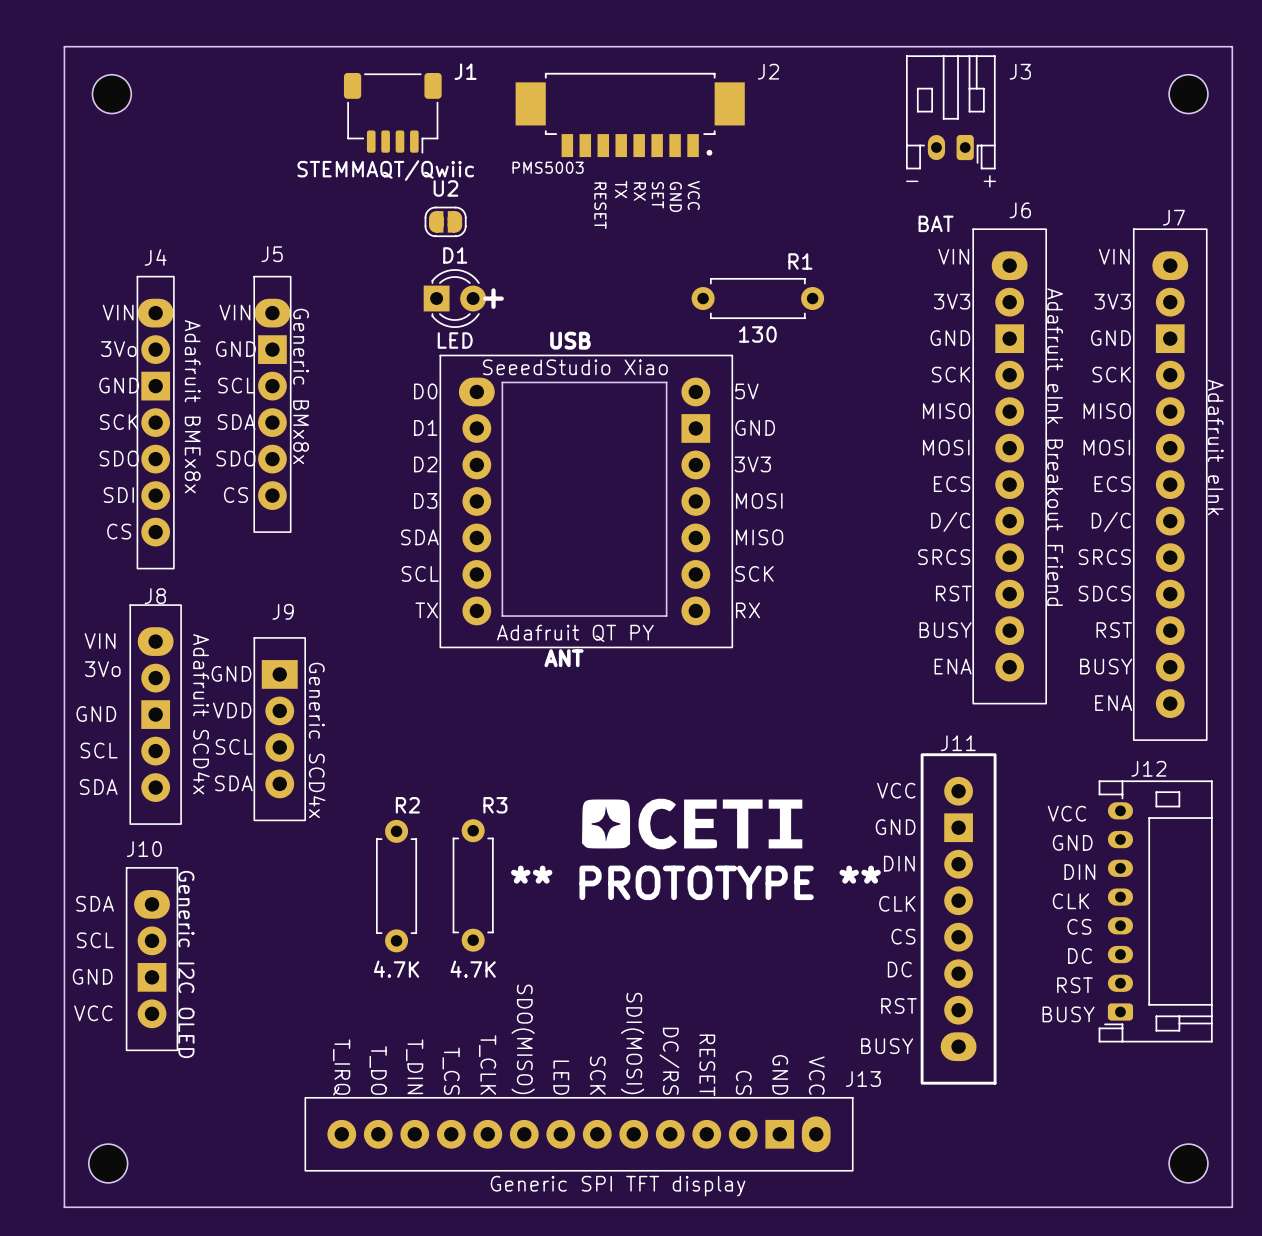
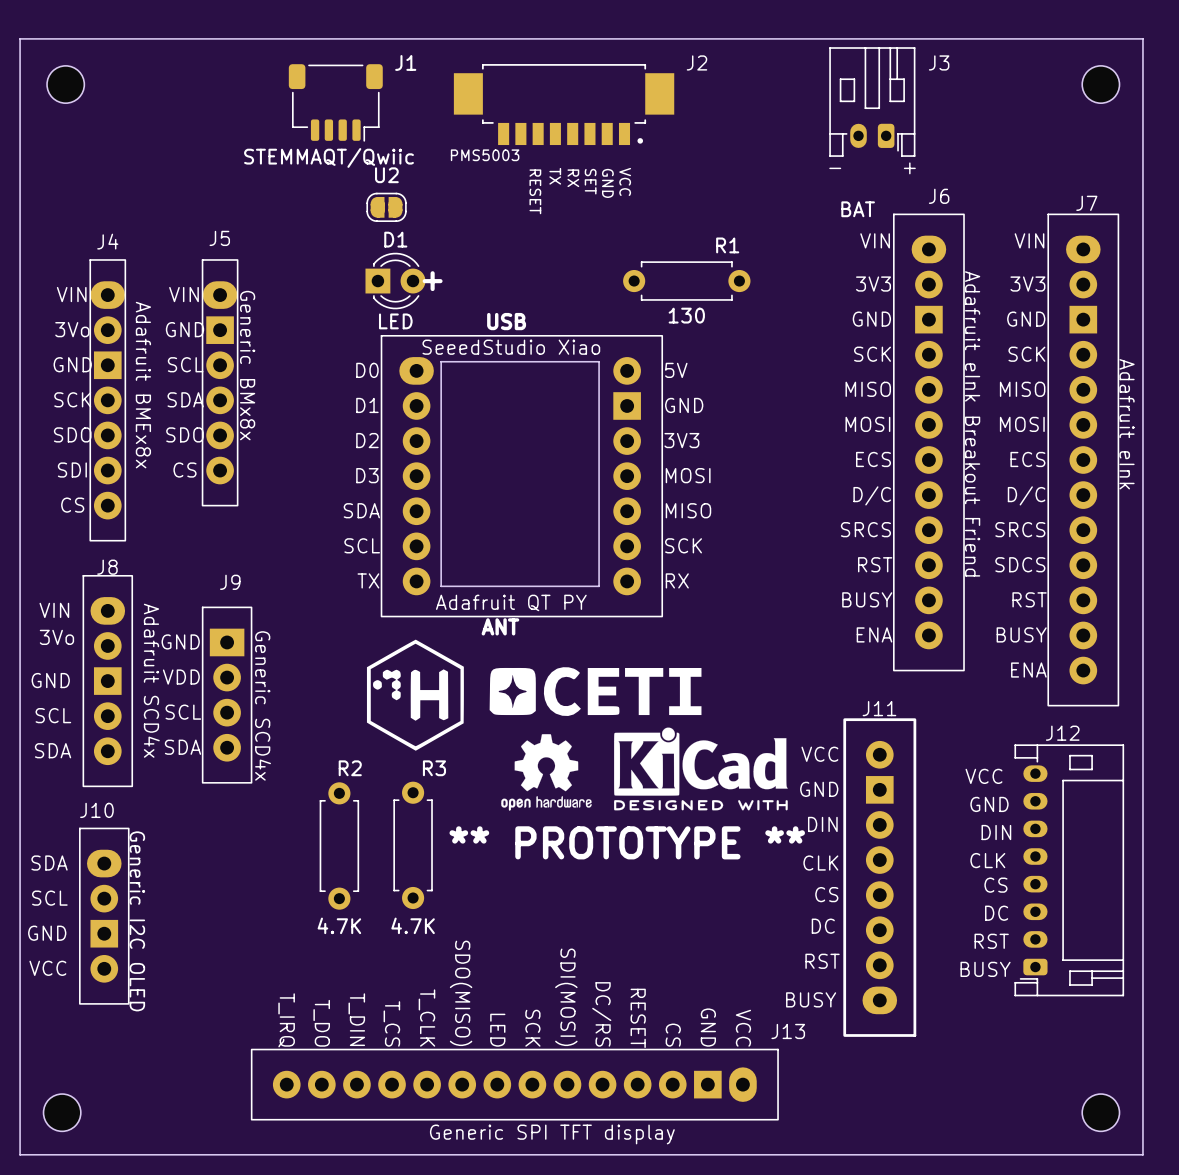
drawing: none -> [366, 639, 464, 751]
drawing: none -> [614, 727, 788, 811]
drawing: none -> [501, 734, 592, 811]
drawing position: (692, 824) -> (595, 691)

